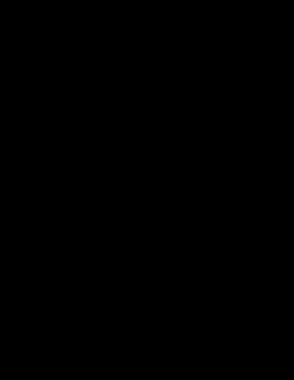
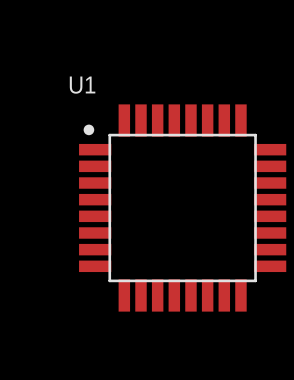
U1: none -> (182, 207)

